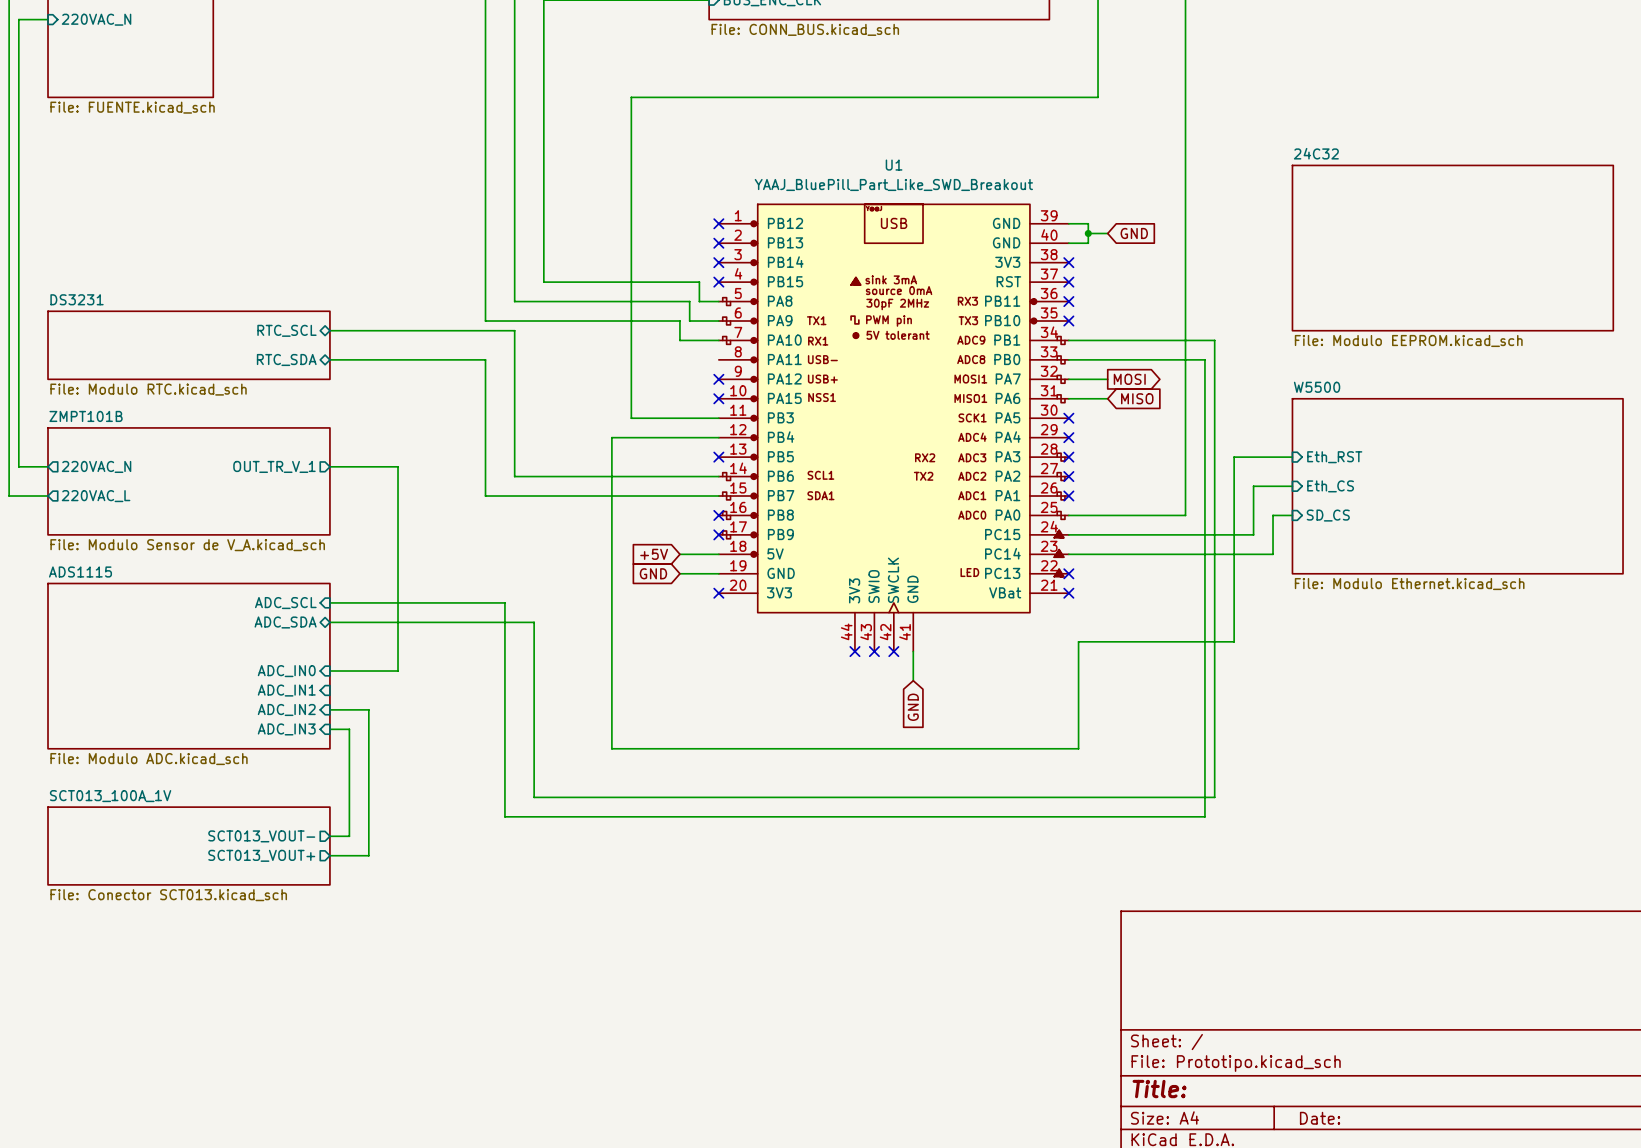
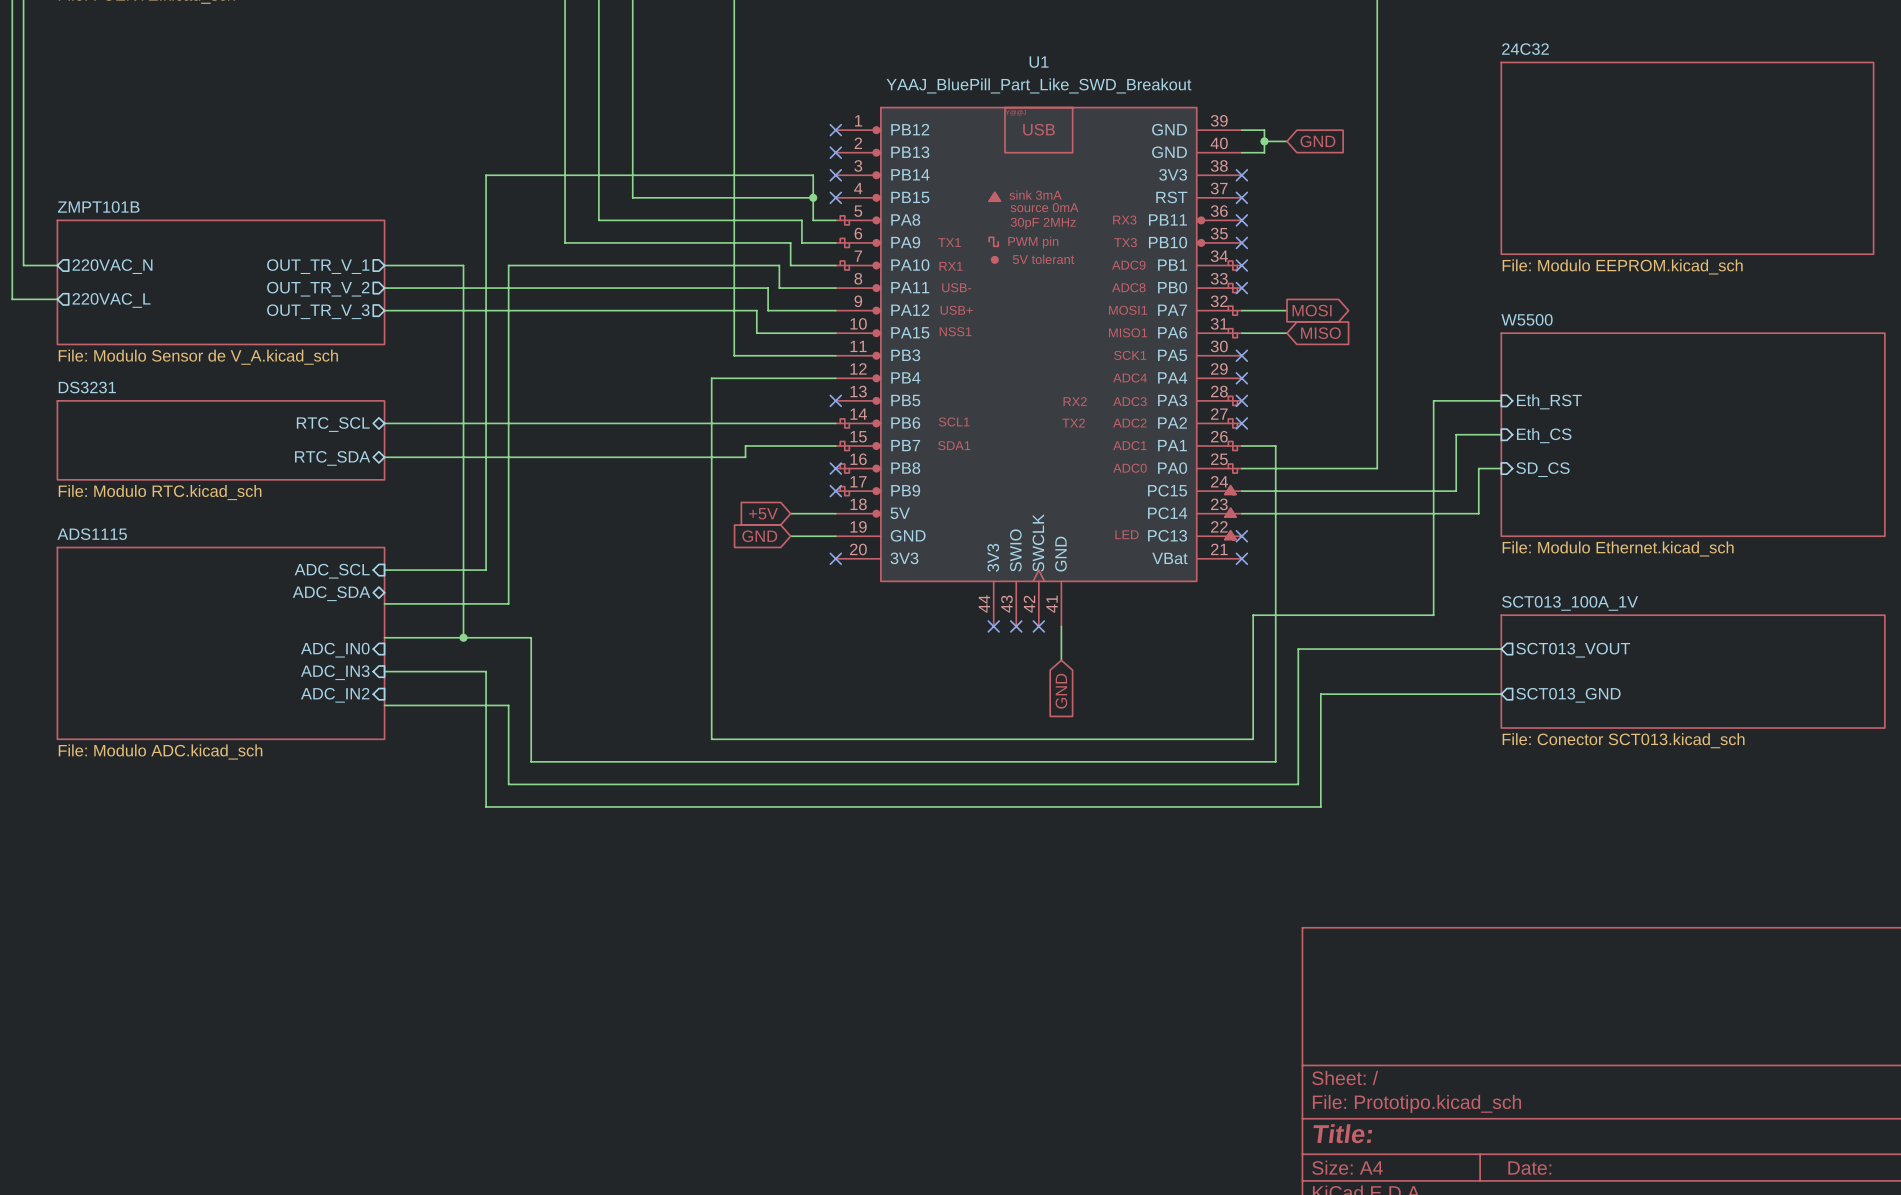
junction: none -> (813, 197)
sheet pin position: RTC_SCL (286, 330) -> RTC_SCL (333, 424)
wire: (329, 330) (514, 330) (514, 476) -> (384, 423) (598, 423)
wire: (18, 340) (18, 466) (48, 466) -> (23, 265) (57, 265)
wire: (1068, 340) (1214, 340) (1214, 797) (534, 797) (534, 622) (329, 622) -> none
no-connect mark: none -> (1241, 265)
sheet DS3231 position: (188, 345) -> (220, 440)
sheet pin shape: bidirectional (286, 359) -> output (318, 289)
sheet pin: RTC_SDA (286, 359) -> OUT_TR_V_2 (318, 289)
wire: (485, 359) (485, 496) (641, 496) -> (565, 288) (768, 288) (768, 310) (835, 310)
wire: none -> (835, 288) (779, 288) (779, 265) (508, 265) (508, 603) (384, 603)
wire: (1068, 359) (1204, 359) (1204, 816) (504, 816) (504, 602) (417, 602) -> (813, 197) (813, 175) (486, 175) (486, 570)
no-connect mark: none -> (1241, 288)
wire: (9, 369) (9, 496) (48, 496) -> (12, 299) (57, 299)
sheet pin: none -> OUT_TR_V_3 (318, 311)
wire: none -> (384, 310) (756, 310) (756, 333) (835, 333)
no-connect mark: (718, 379) -> none
no-connect mark: (718, 398) -> none
sheet pin position: 220VAC_N (96, 466) -> 220VAC_N (112, 266)
sheet pin position: OUT_TR_V_1 (274, 466) -> OUT_TR_V_1 (318, 266)
wire: (329, 466) (398, 466) -> (384, 265) (463, 265) (463, 412)
sheet ZMPT101B position: (188, 481) -> (220, 282)
sheet pin position: 220VAC_L (96, 496) -> 220VAC_L (111, 300)
wire: none -> (745, 445) (745, 457) (384, 457)
wire: none -> (1241, 445) (1275, 445) (1275, 761) (531, 761) (531, 637) (384, 637)
no-connect mark: (1068, 496) -> none
sheet pin: none -> RTC_SDA (332, 458)
wire: (398, 661) (398, 671) (329, 671) -> none
junction: none -> (463, 637)
wire: none -> (1501, 649) (1298, 649) (1298, 784) (508, 784) (508, 705) (384, 705)
sheet pin: none -> SCT013_VOUT (1573, 650)
sheet pin: ADC_IN1 (286, 690) -> ADC_IN3 (335, 672)
wire: none -> (384, 671) (486, 671) (486, 806) (1320, 806) (1320, 694) (1501, 694)
wire: (329, 709) (368, 709) (368, 855) (329, 855) -> none
sheet pin: none -> SCT013_GND (1568, 695)
sheet pin: ADC_IN3 (286, 729) -> none
wire: (329, 729) (349, 729) (349, 836) (329, 836) -> none
sheet SCT013_100A_1V name position: SCT013_100A_1V (110, 796) -> SCT013_100A_1V (1570, 603)
sheet SCT013_100A_1V shape: [47, 806, 331, 886] -> [1500, 614, 1886, 729]
sheet pin: SCT013_VOUT- (261, 836) -> none
sheet pin: SCT013_VOUT+ (261, 855) -> none
sheet SCT013_100A_1V value position: File: Conector SCT013.kicad_sch (168, 895) -> File: Conector SCT013.kicad_sch (1623, 740)

